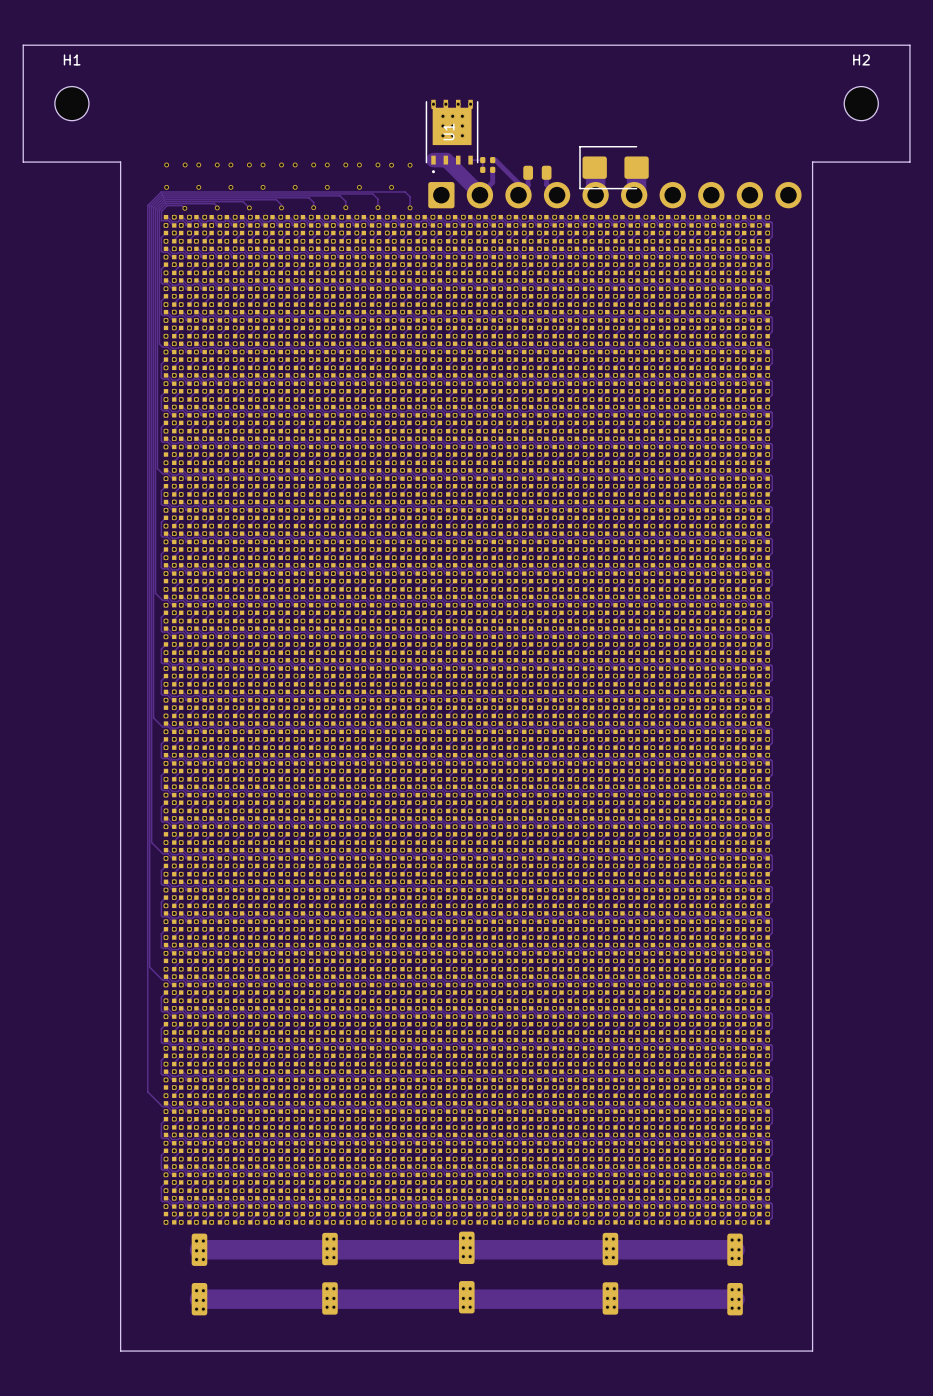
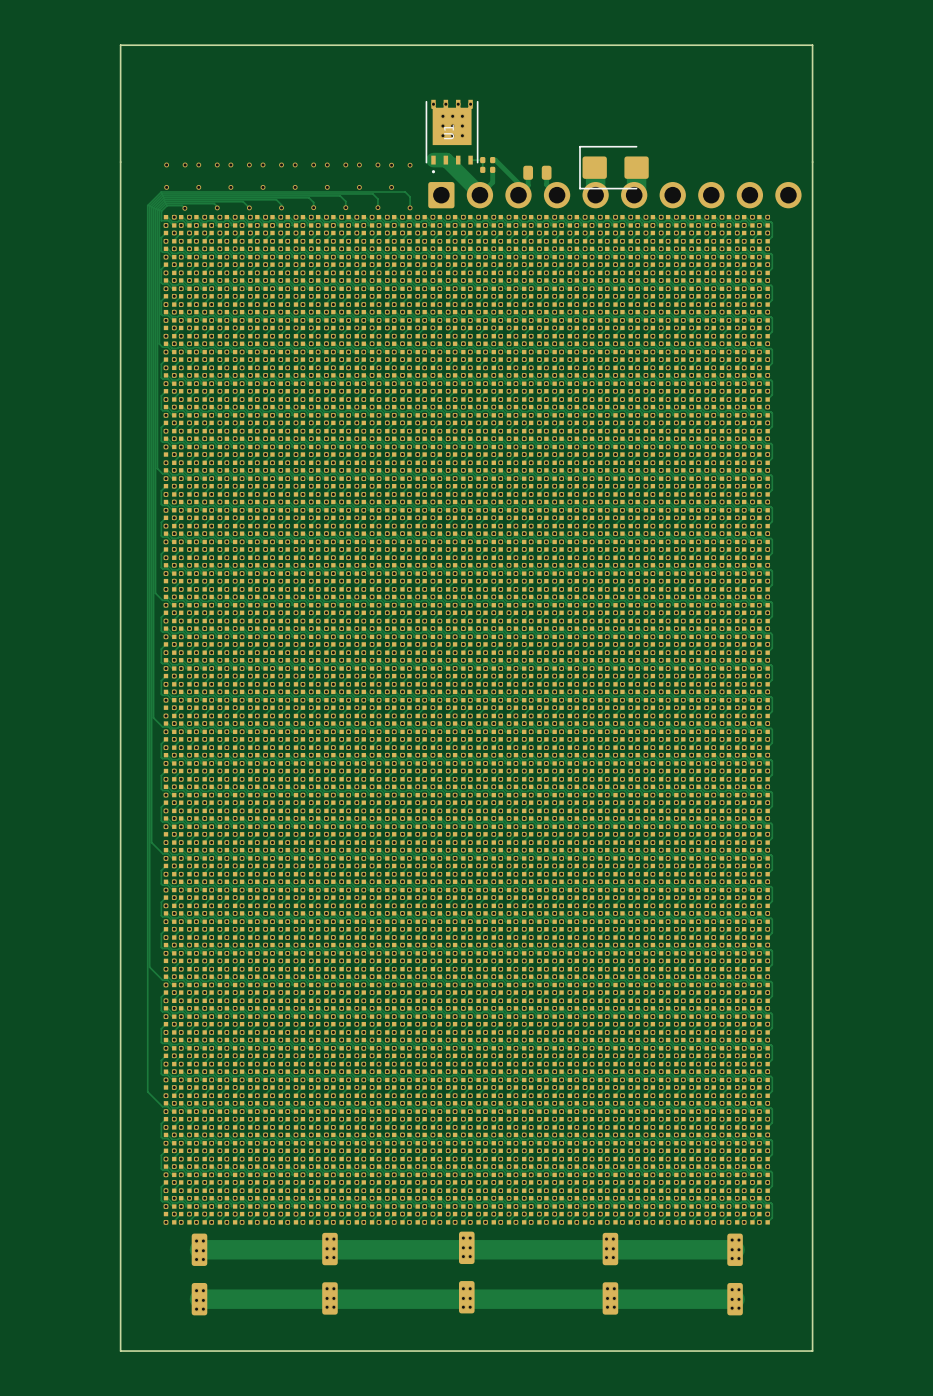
board edge: (120, 45) (23, 45) (23, 162) (120, 162) -> (120, 45) (120, 162)
board edge: (812, 45) (909, 45) (909, 162) (812, 162) -> (812, 45) (812, 162)
H1: (71, 103) -> none
H2: (861, 103) -> none

